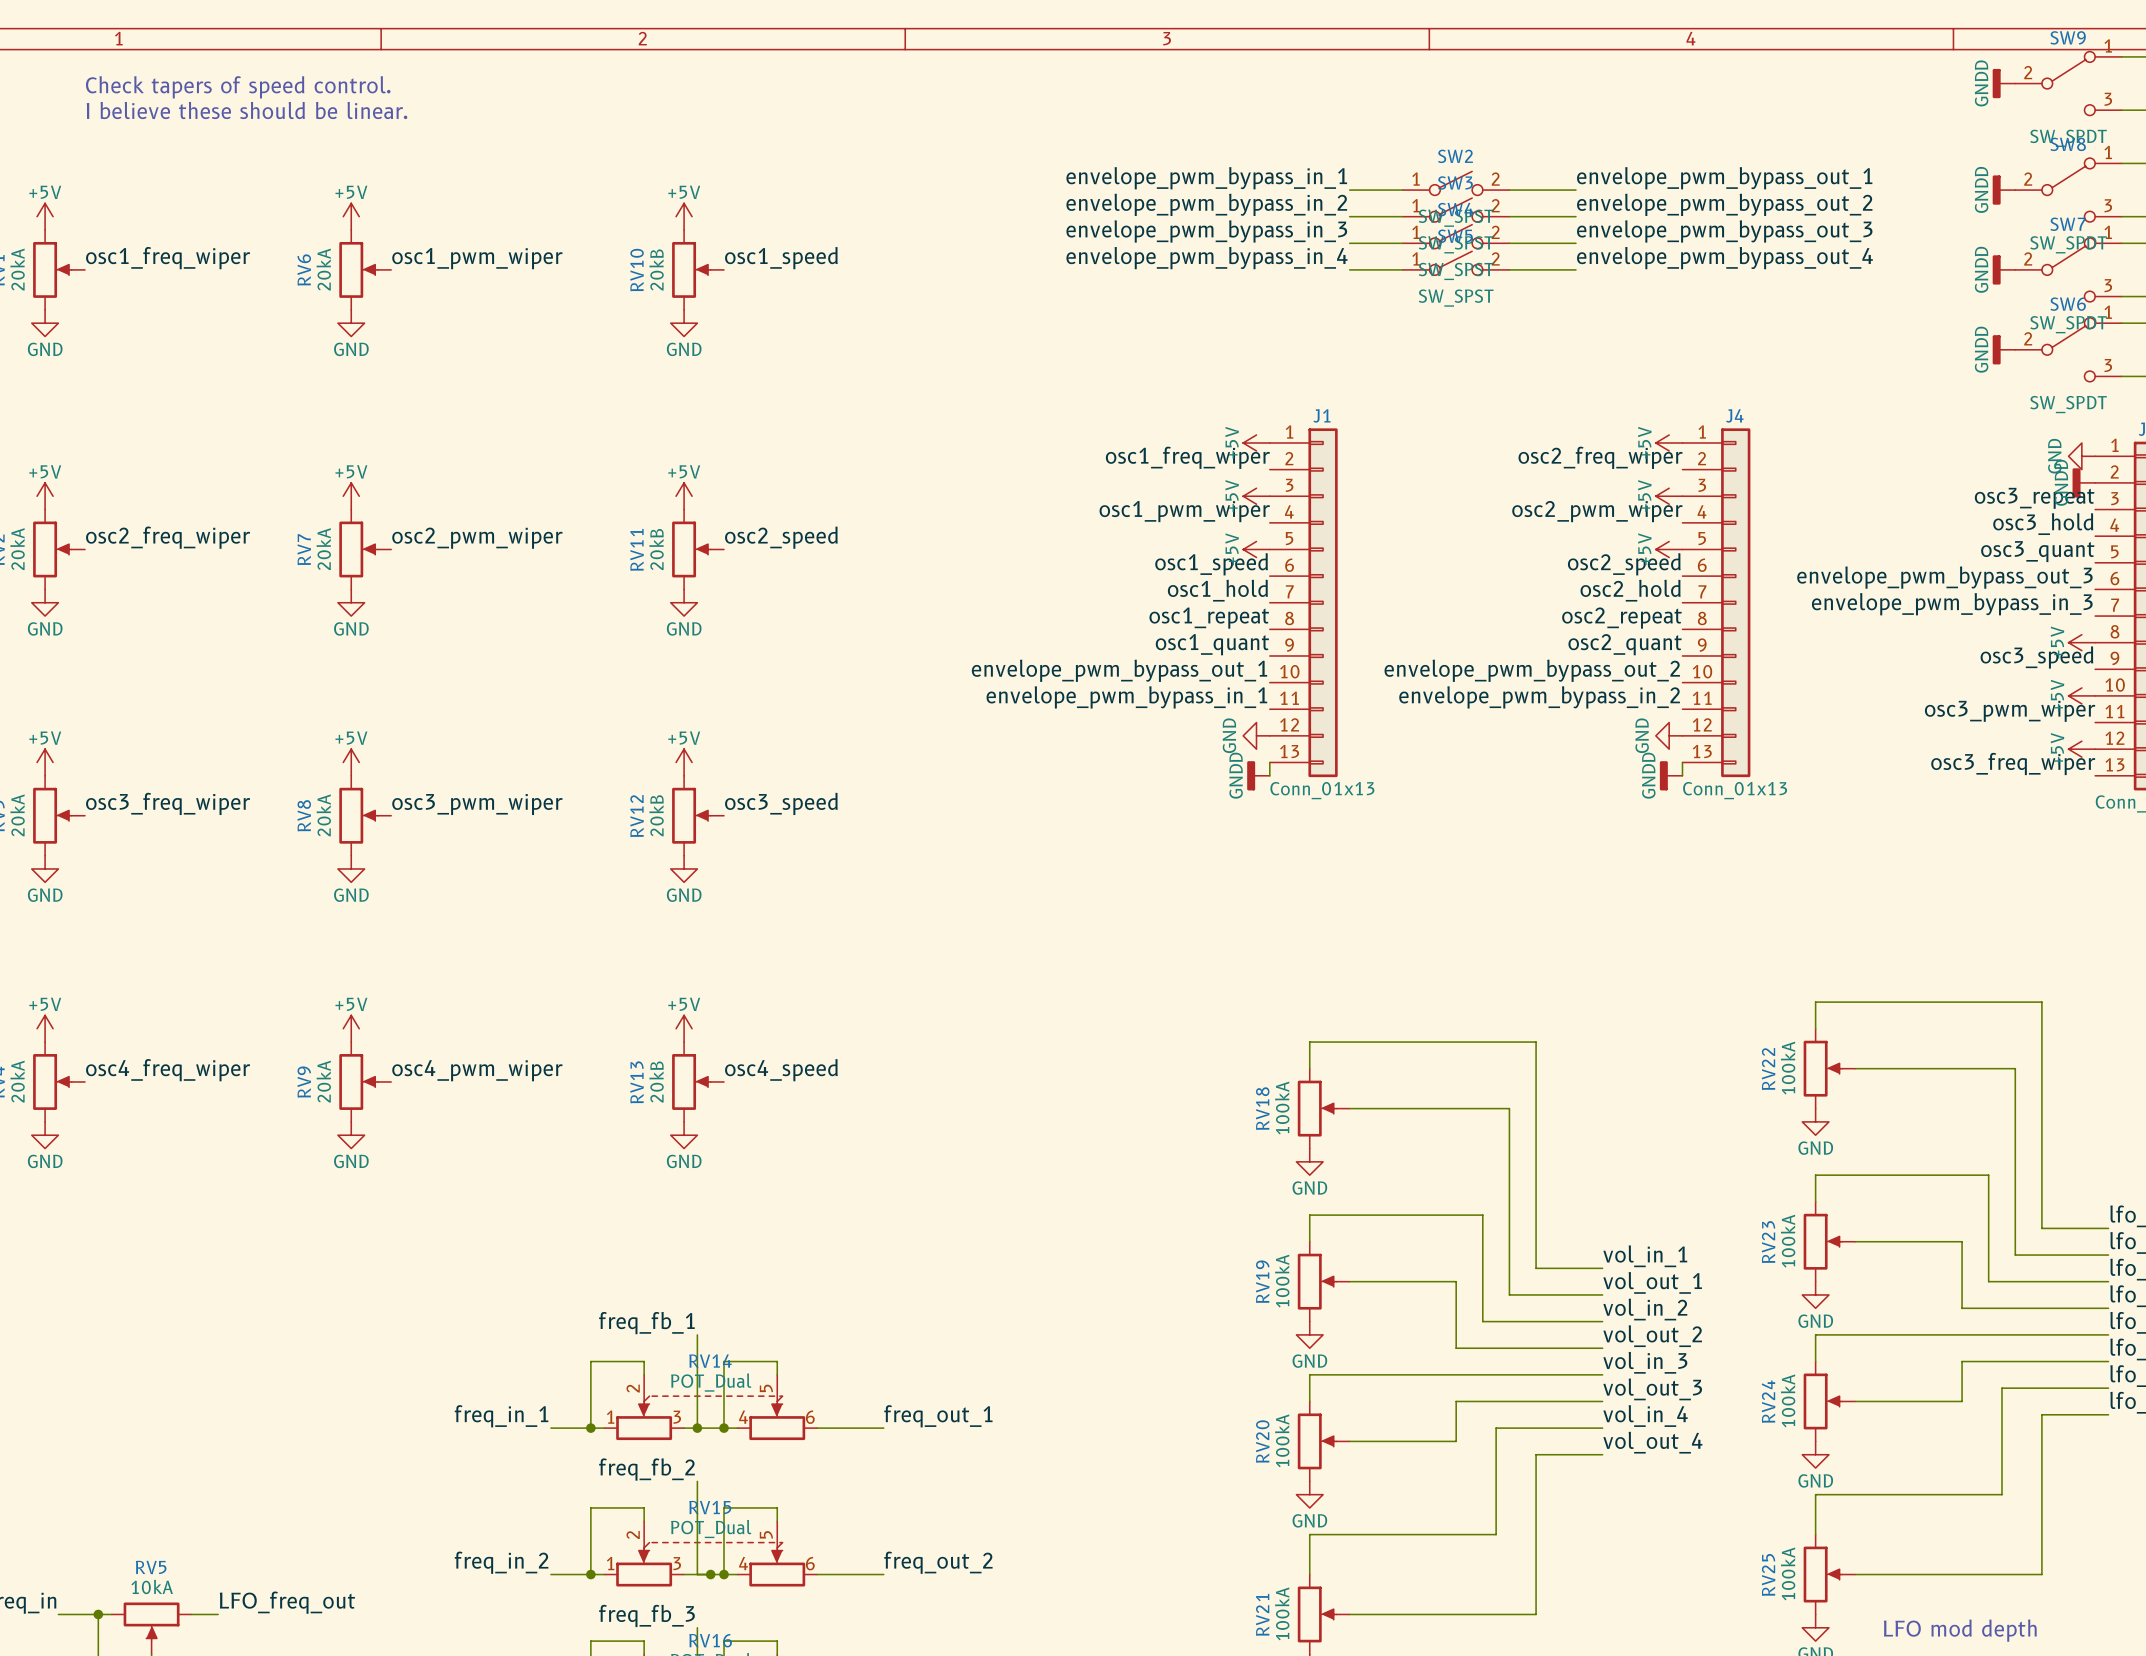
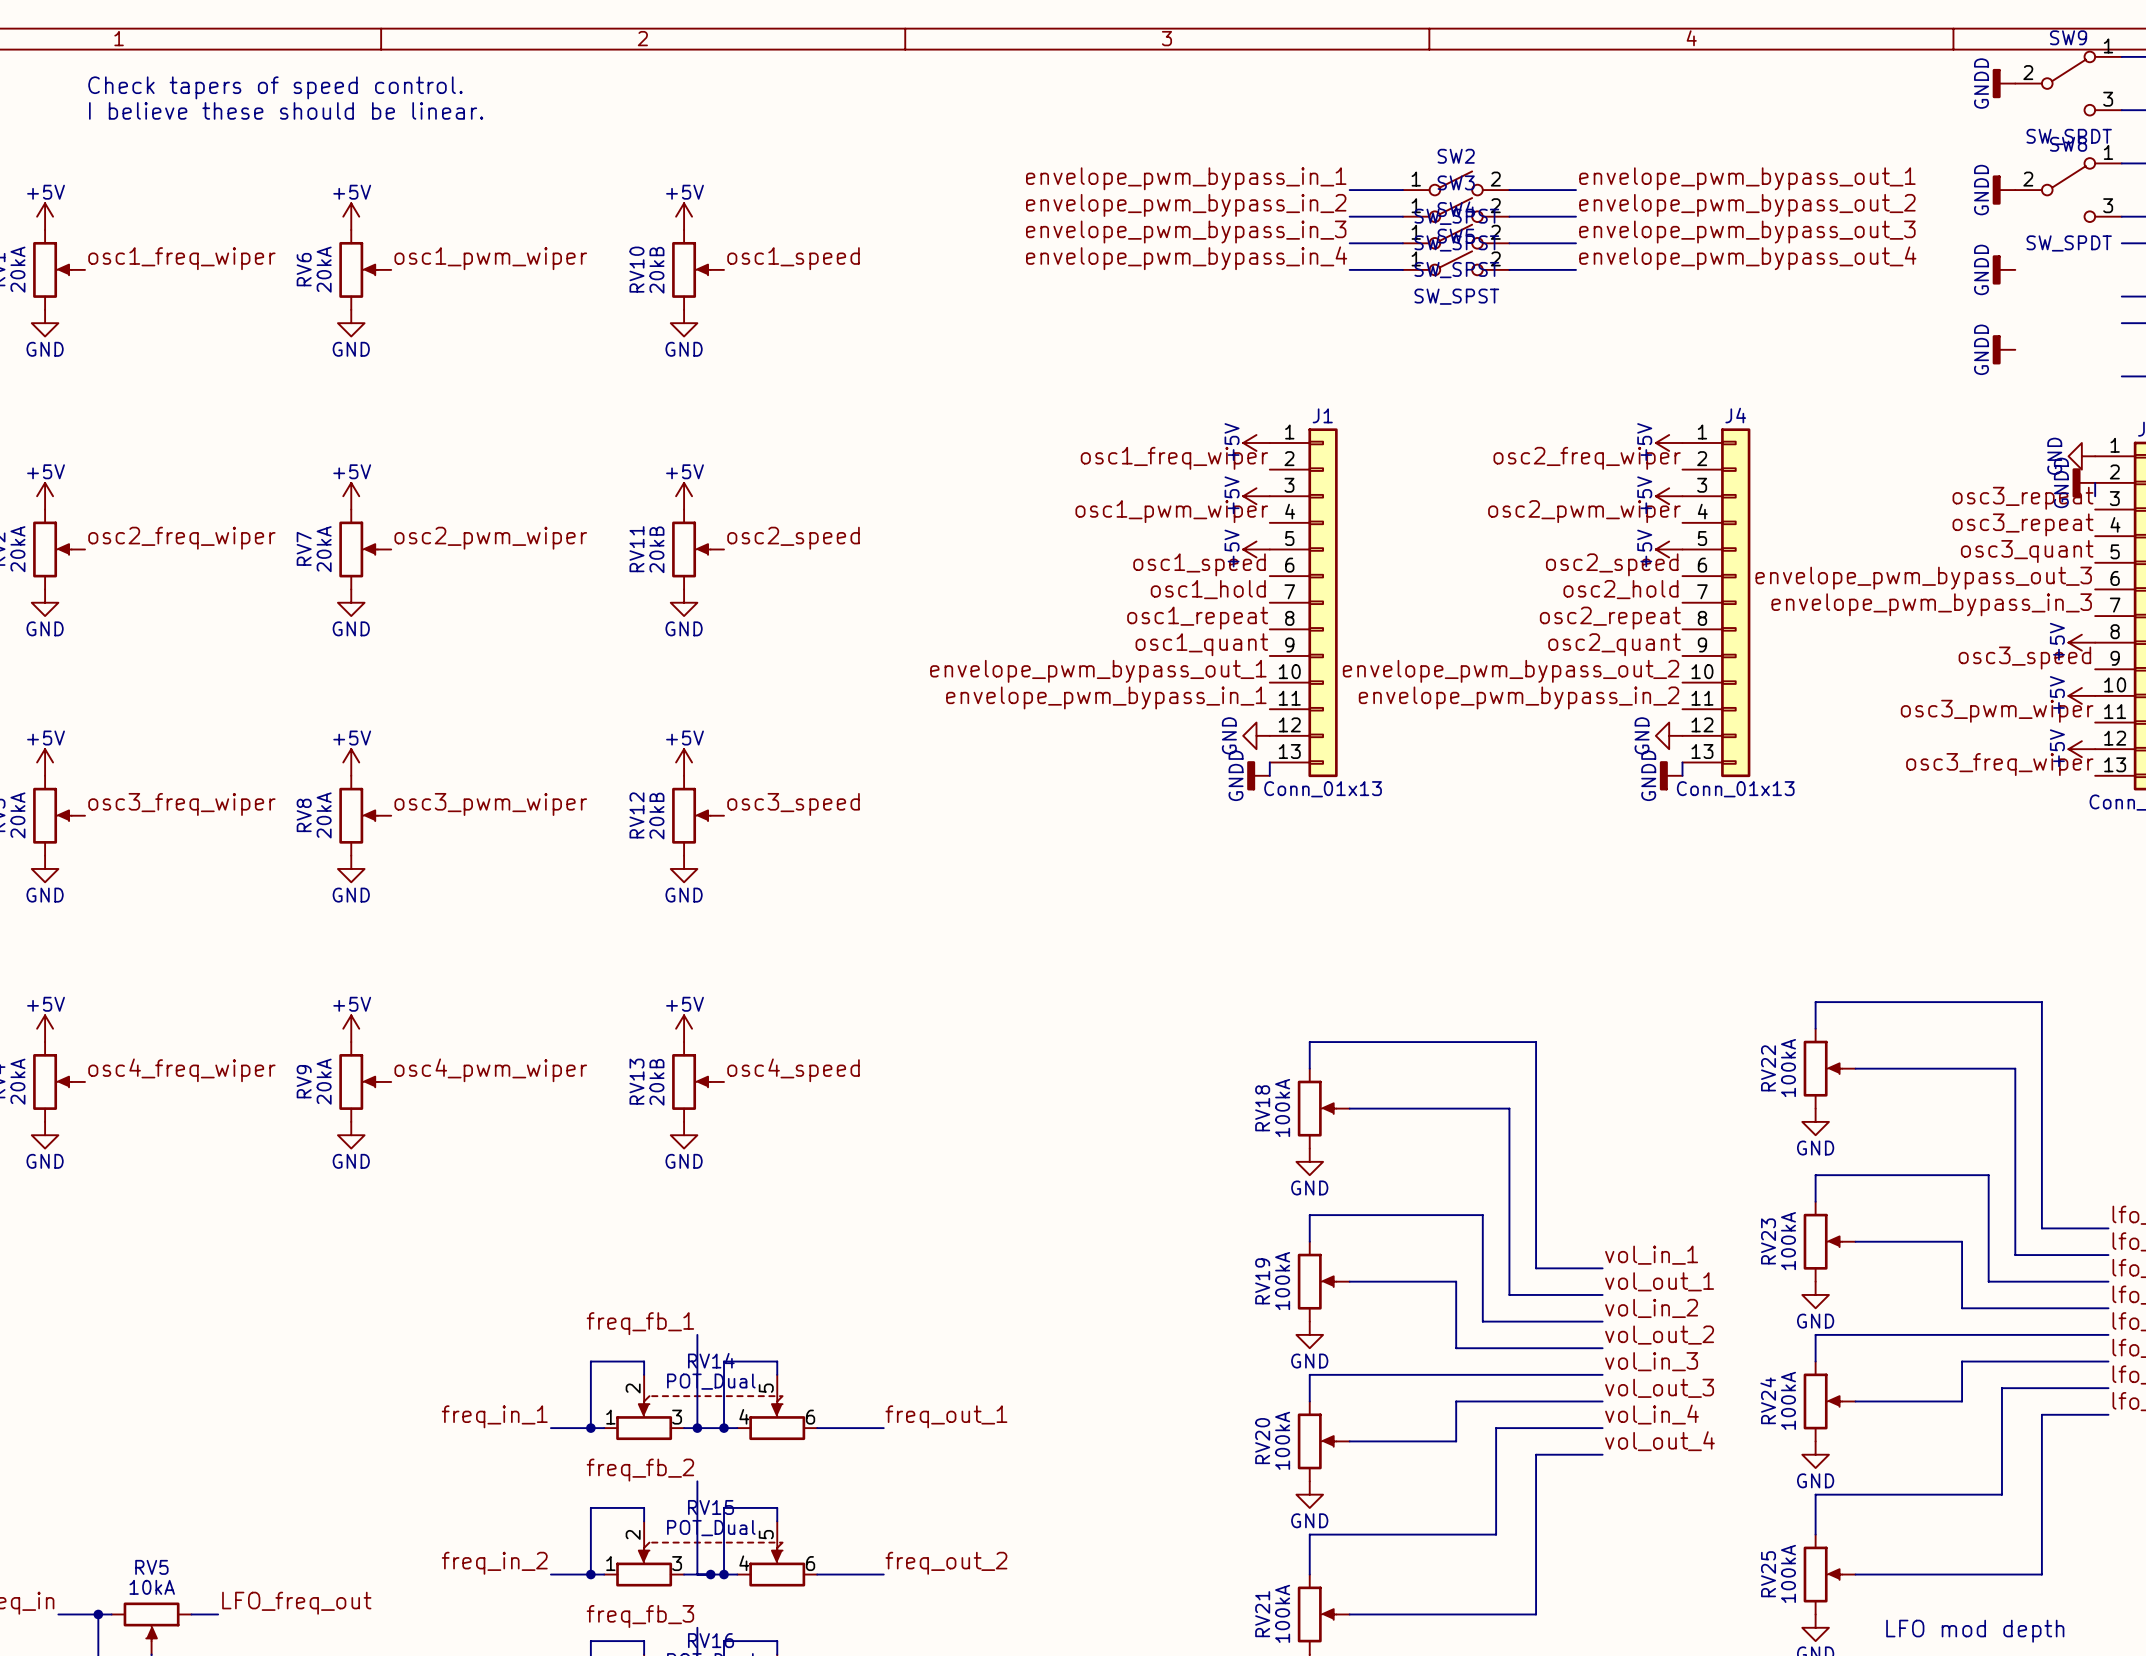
SW7: SW_SPDT (2068, 269) -> none
SW6: SW_SPDT (2068, 349) -> none
wire: none -> (2095, 482) (2095, 496)
label: osc3_hold (2043, 524) -> osc3_repeat (2022, 524)

